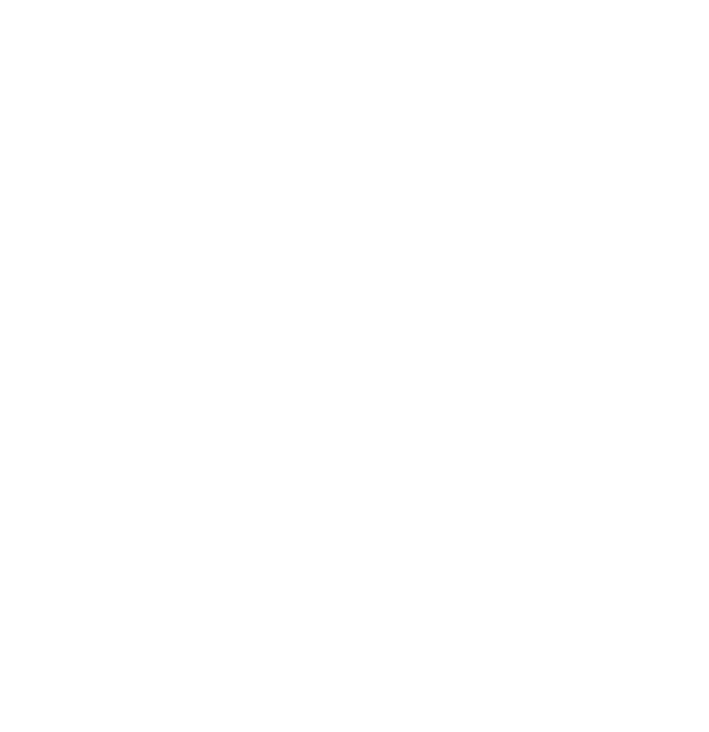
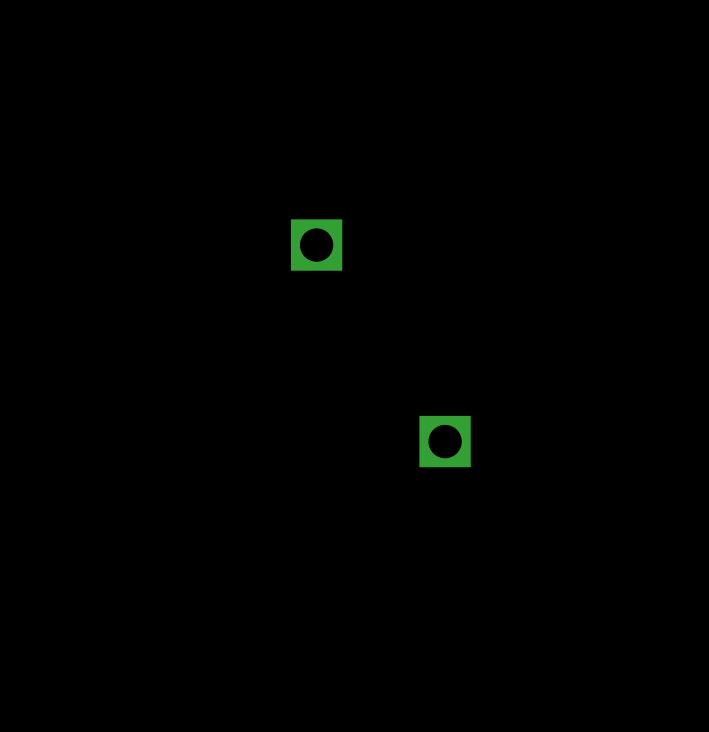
part: none -> (316, 245)
part: none -> (445, 441)

